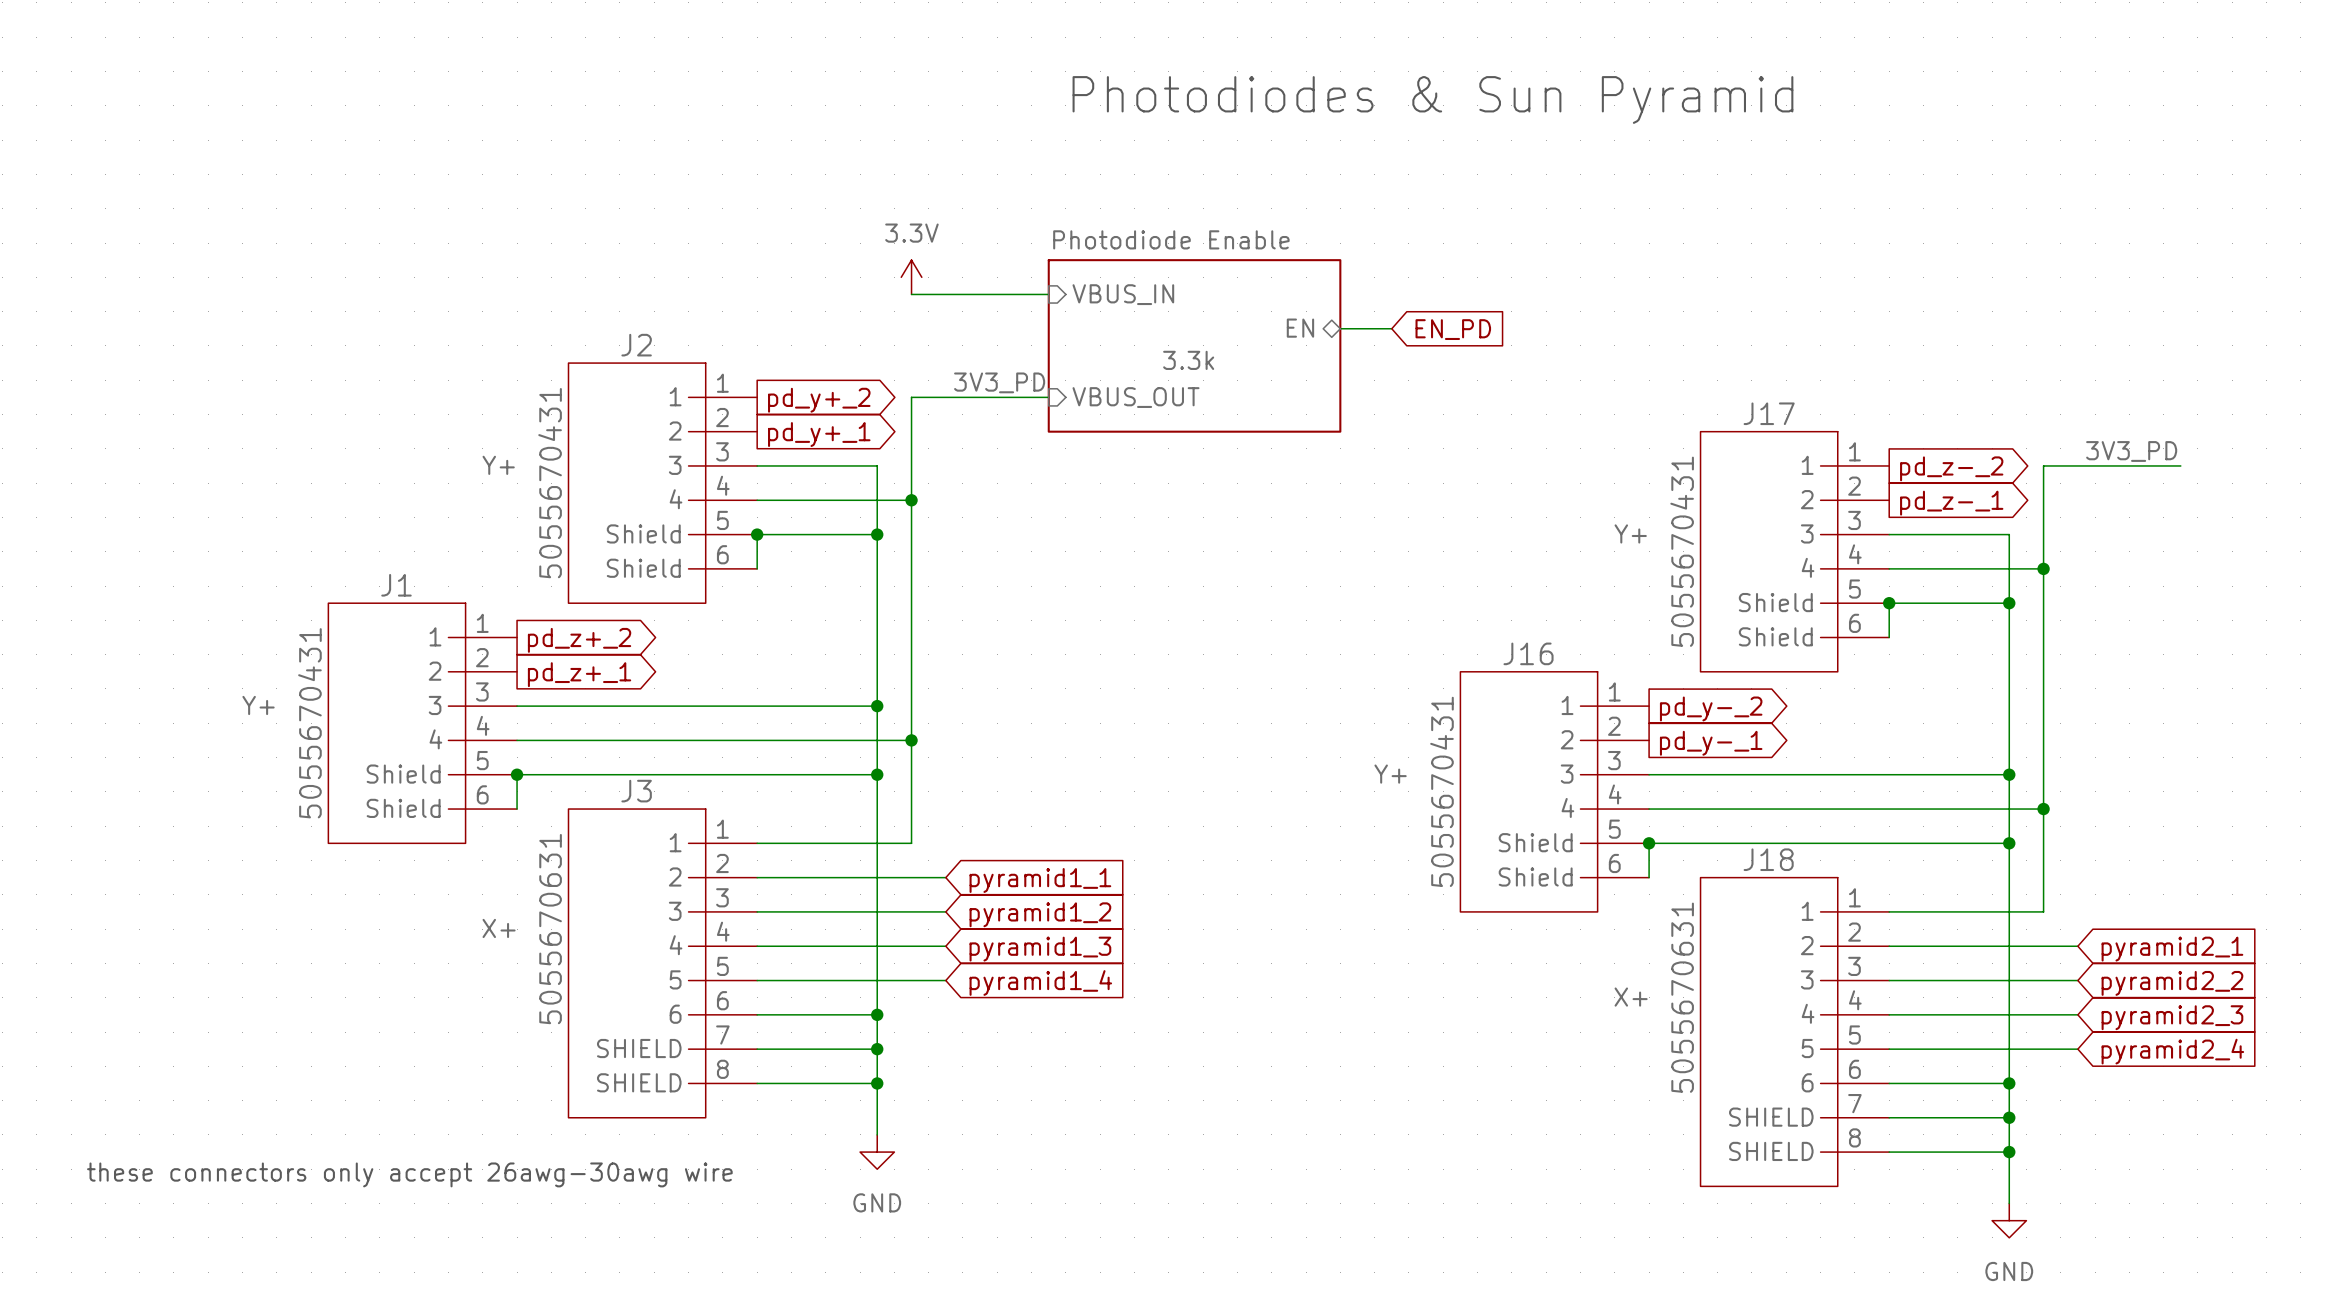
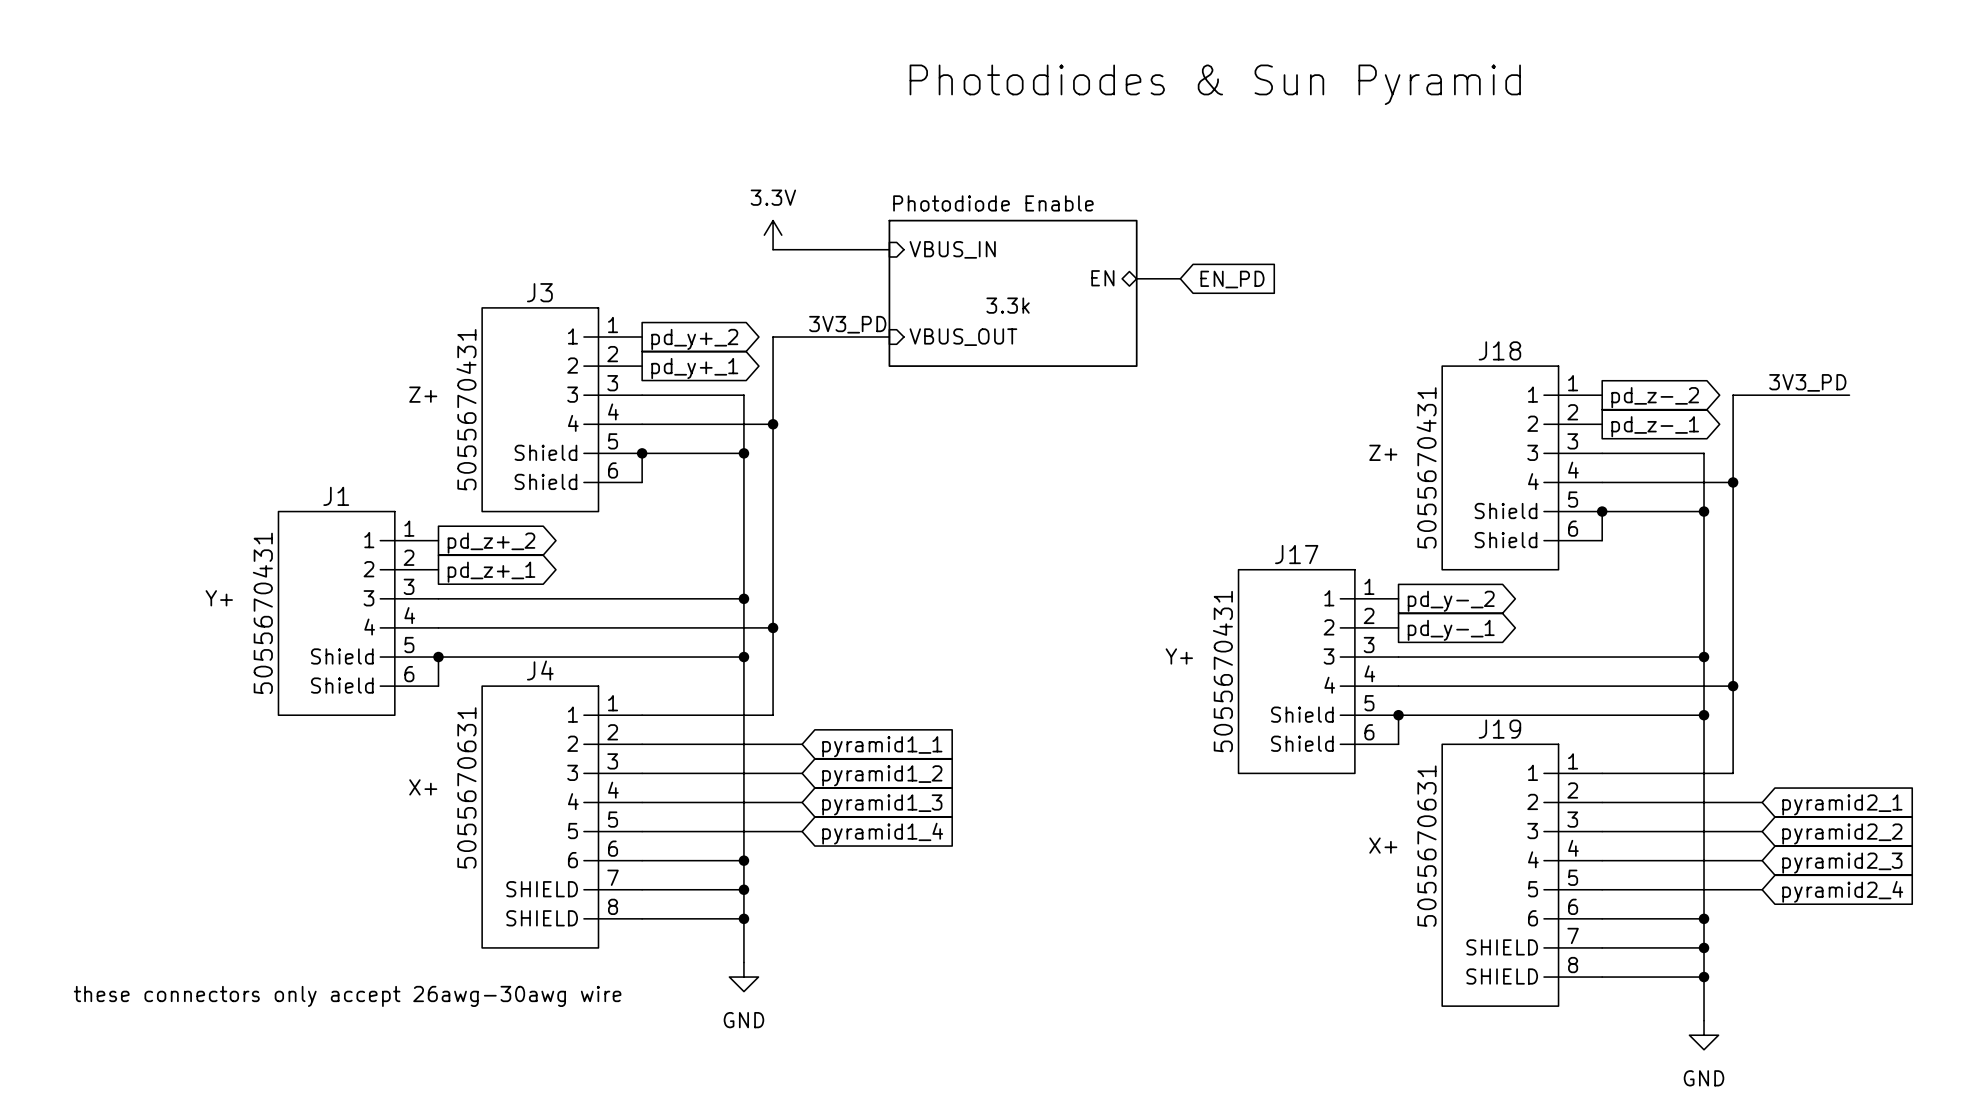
J2 name: J2 (636, 345) -> J3 (539, 292)
J17 name: J17 (1769, 413) -> J18 (1499, 350)
J2 text: Y+ (498, 465) -> Z+ (423, 394)
J17 text: Y+ (1630, 533) -> Z+ (1383, 452)
J16 name: J16 (1528, 653) -> J17 (1296, 554)
J3 name: J3 (636, 791) -> J4 (540, 670)
J18 name: J18 (1768, 859) -> J19 (1499, 729)

